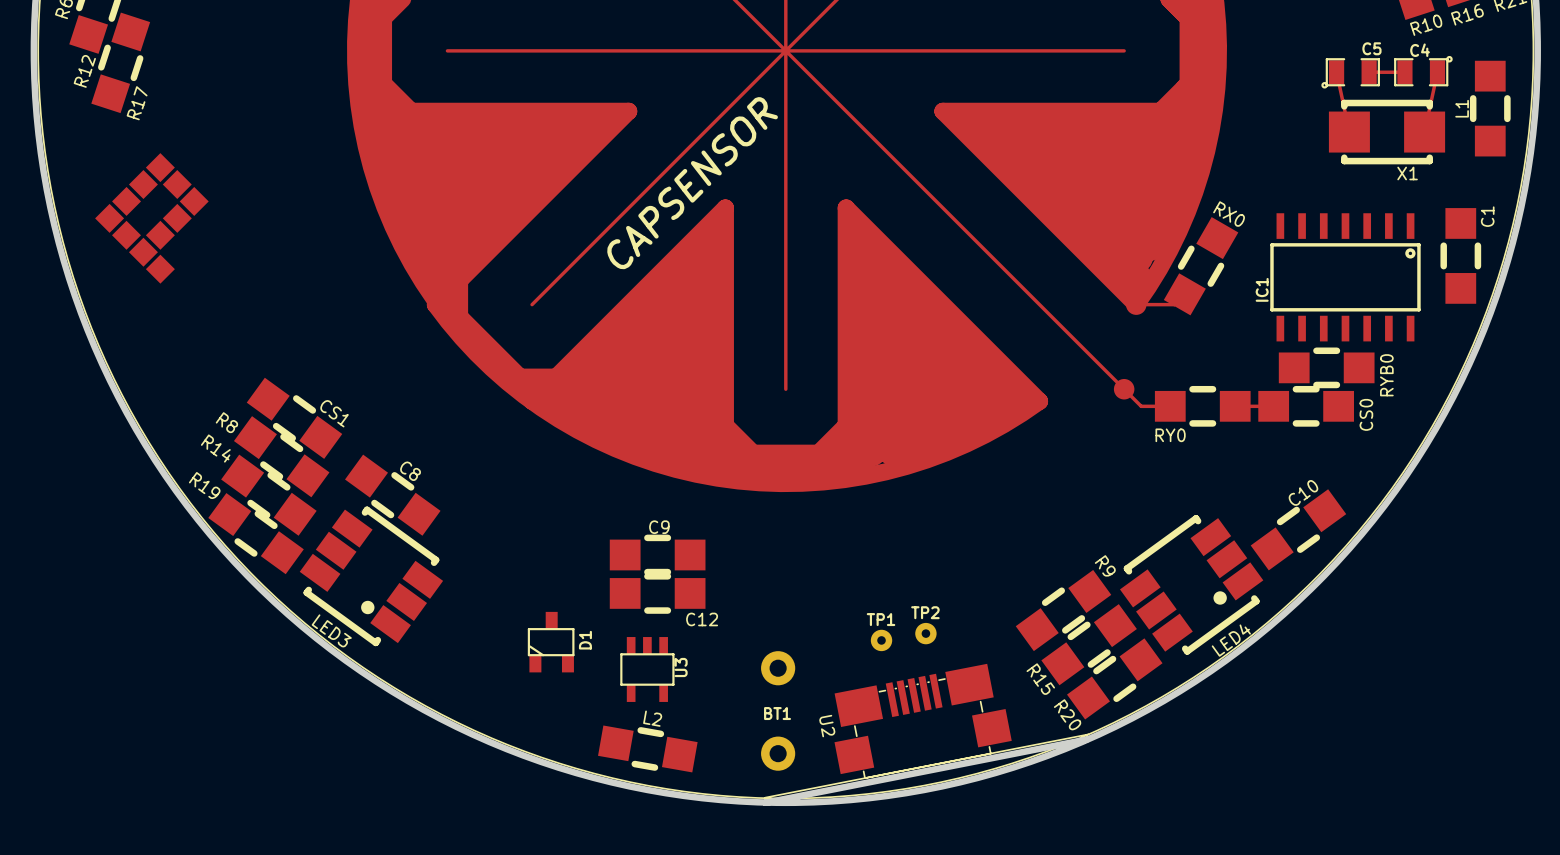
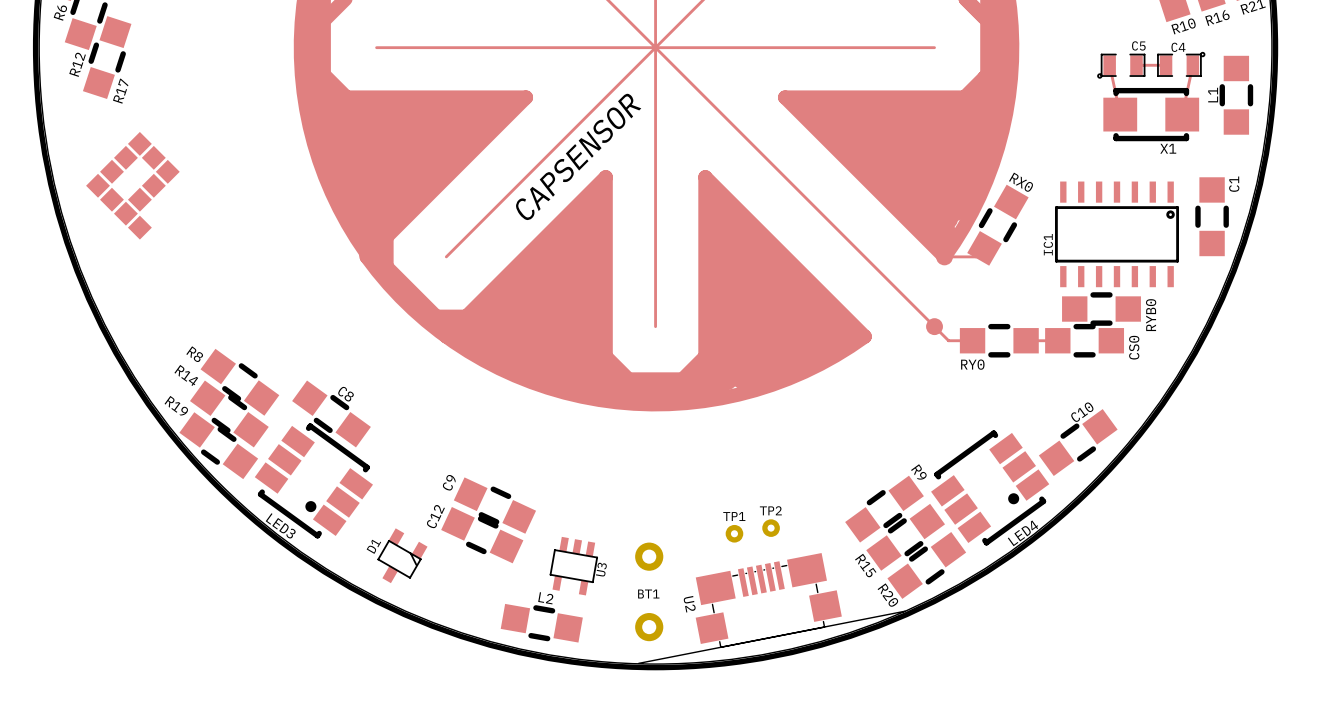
CS1: (294, 418) -> none
C9 name position: C9 (659, 527) -> C9 (449, 482)
C9 rotation: 0° (657, 554) -> 25° clockwise (494, 505)
C9 position: (657, 554) -> (494, 505)
C12 rotation: 0° (657, 593) -> 25° clockwise (482, 535)
C12 position: (657, 593) -> (482, 535)
C12 name position: C12 (702, 619) -> C12 (435, 516)
D1 rotation: 0° (551, 642) -> 150° counterclockwise (402, 555)
D1 position: (551, 642) -> (402, 555)
U3 rotation: 0° (647, 669) -> 10° clockwise (573, 566)
U3 position: (647, 669) -> (573, 566)
board edge: (1086, 739) (765, 802) -> none

